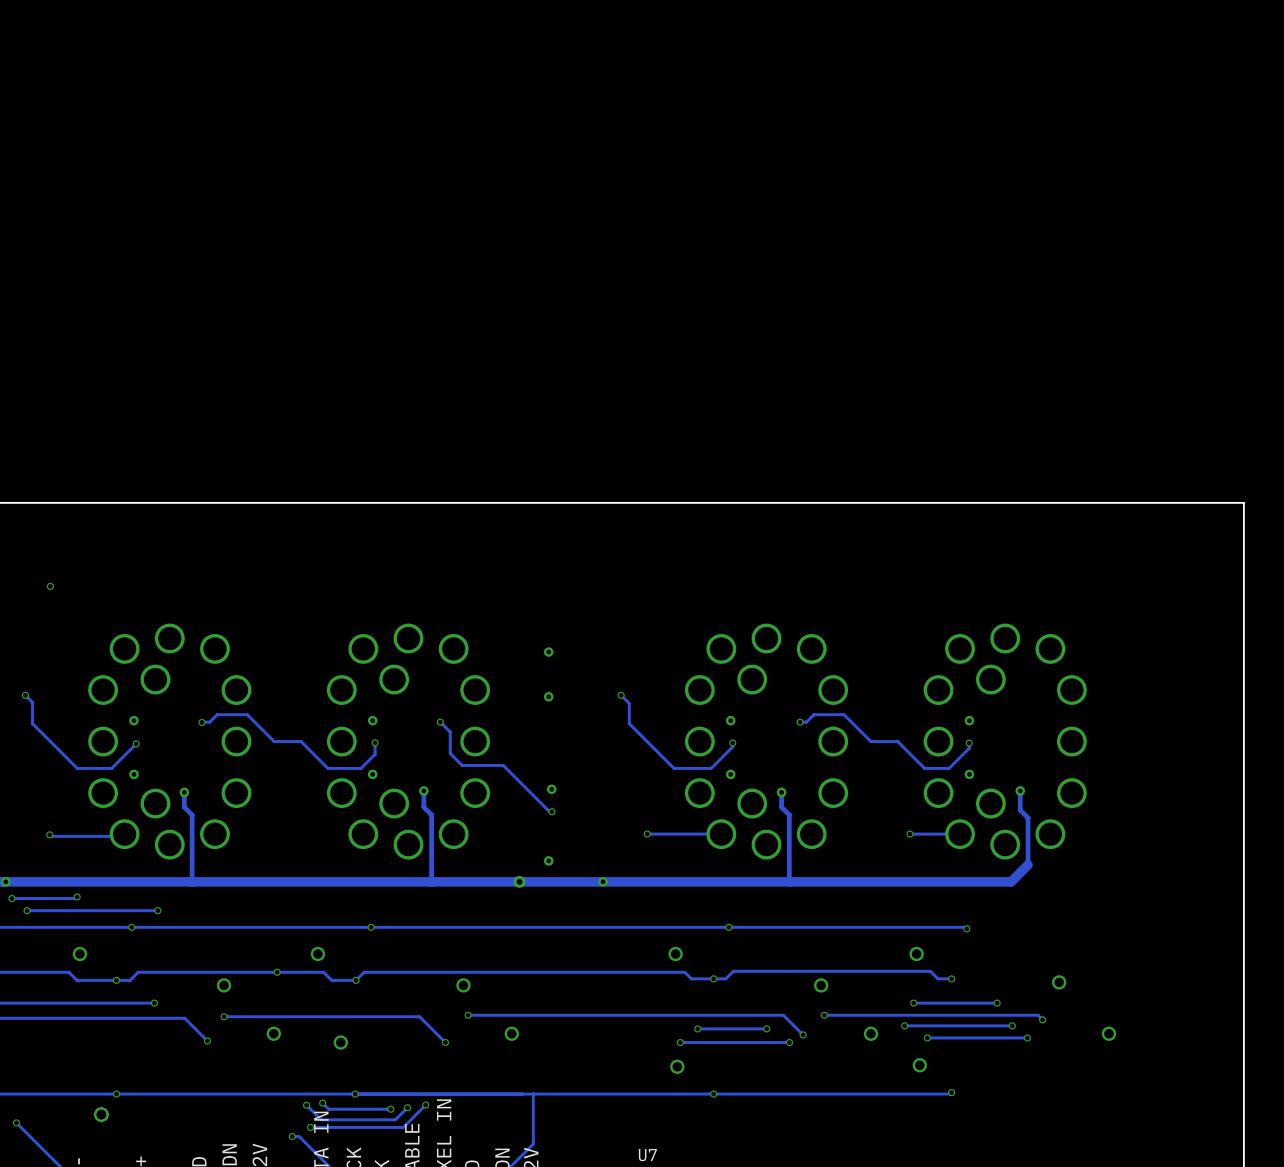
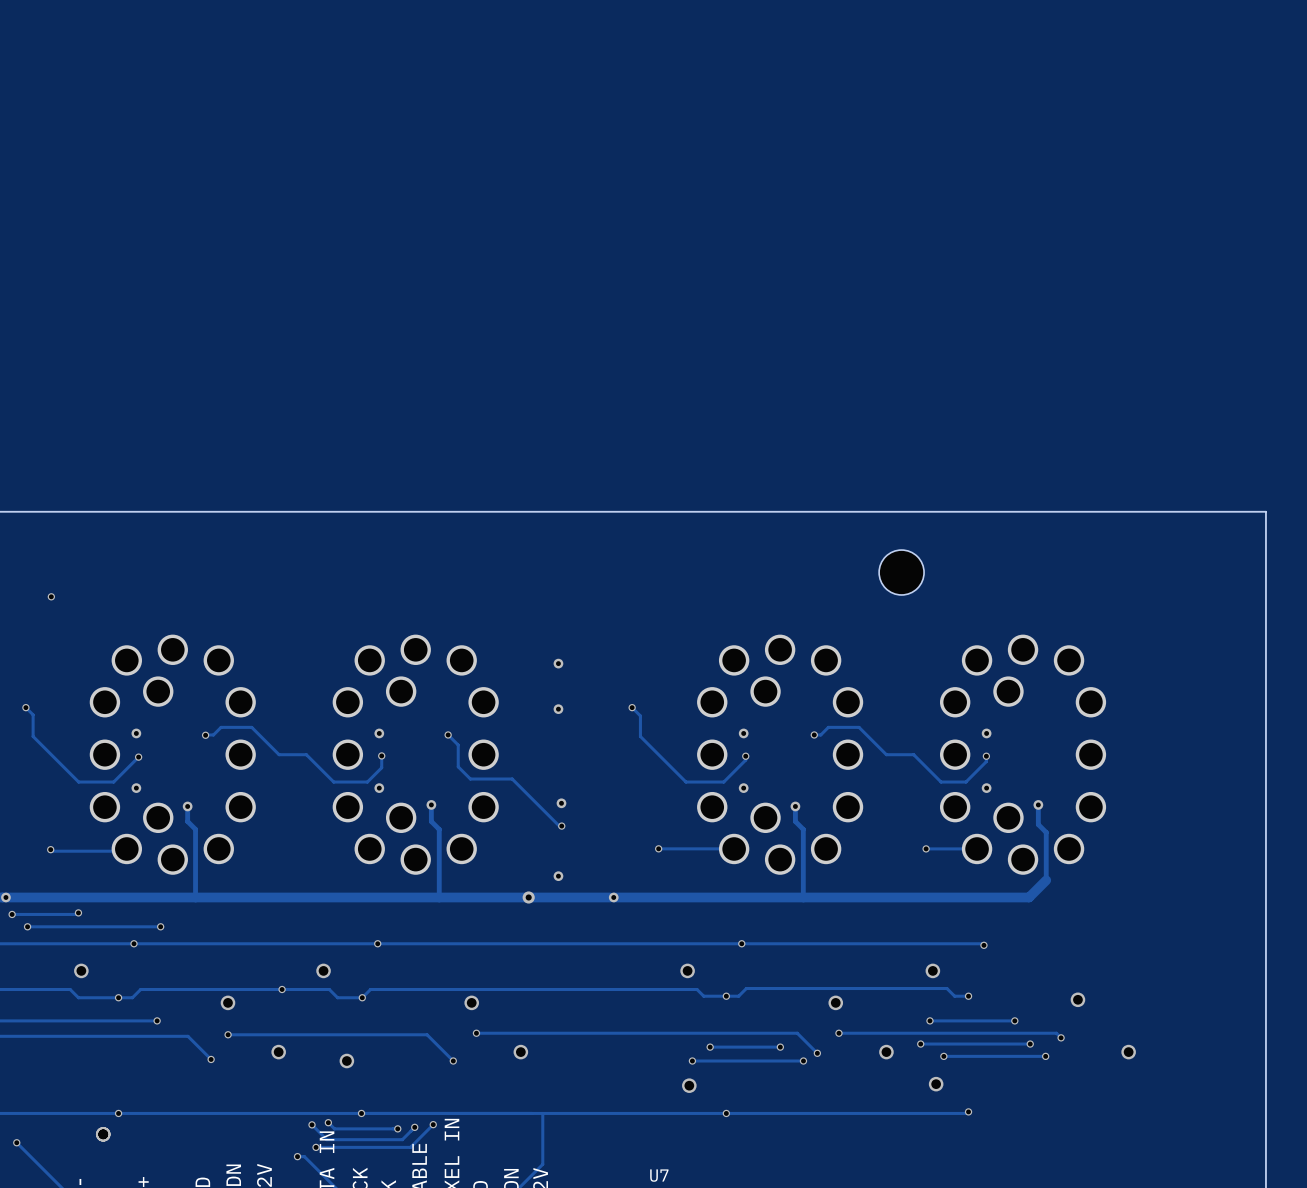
part: none -> (901, 572)

